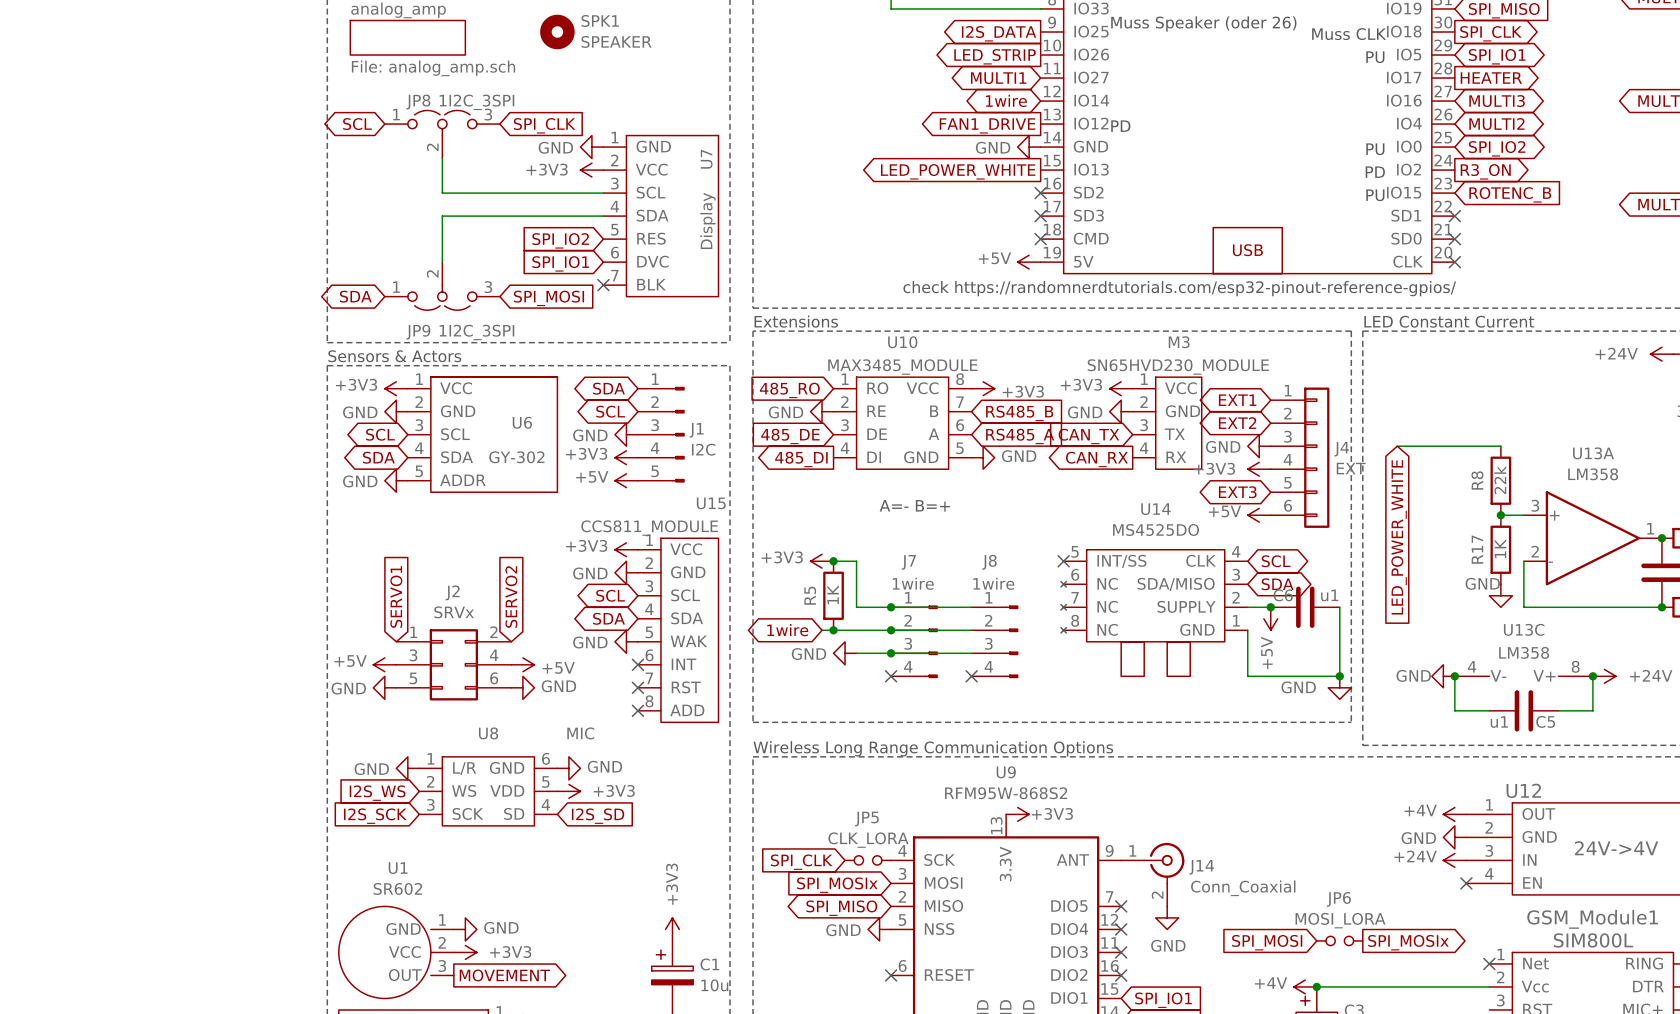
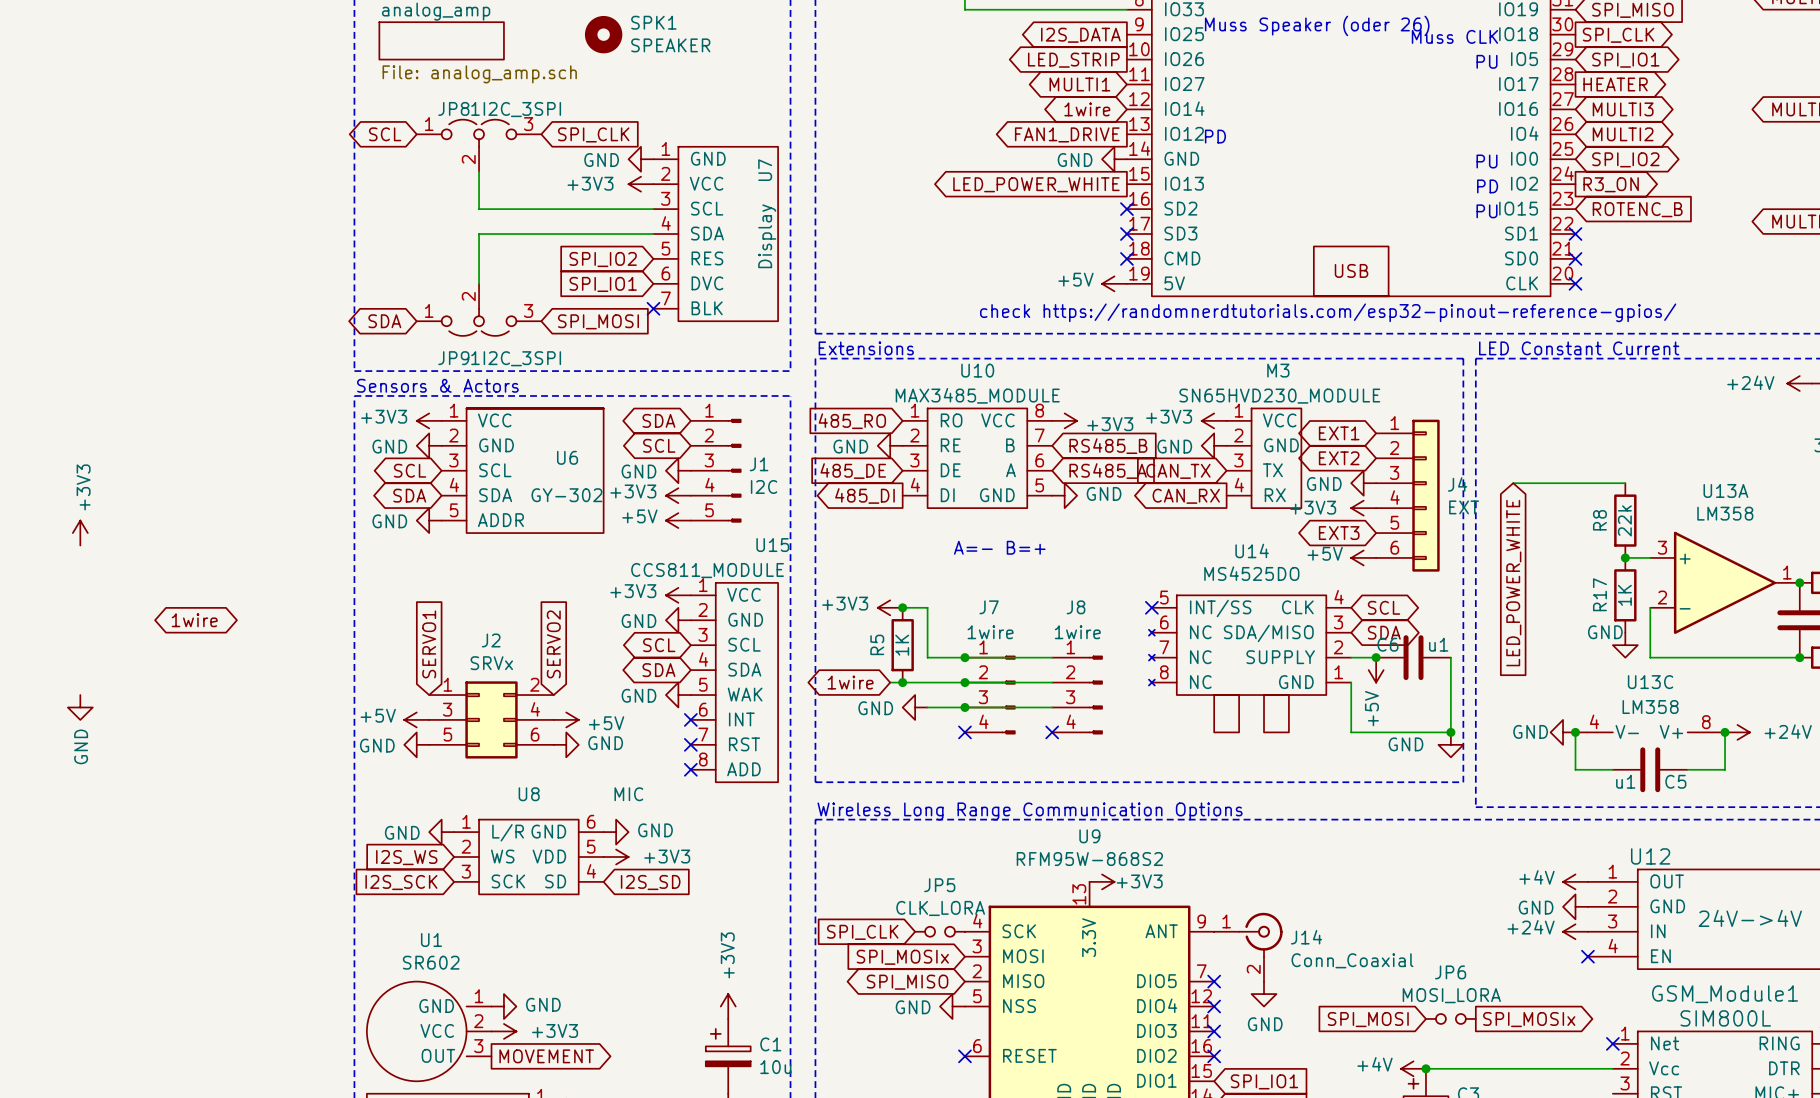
power symbol: none -> +3V3 (80, 533)
global label: none -> 1wire (194, 620)
power symbol: none -> GND (80, 707)

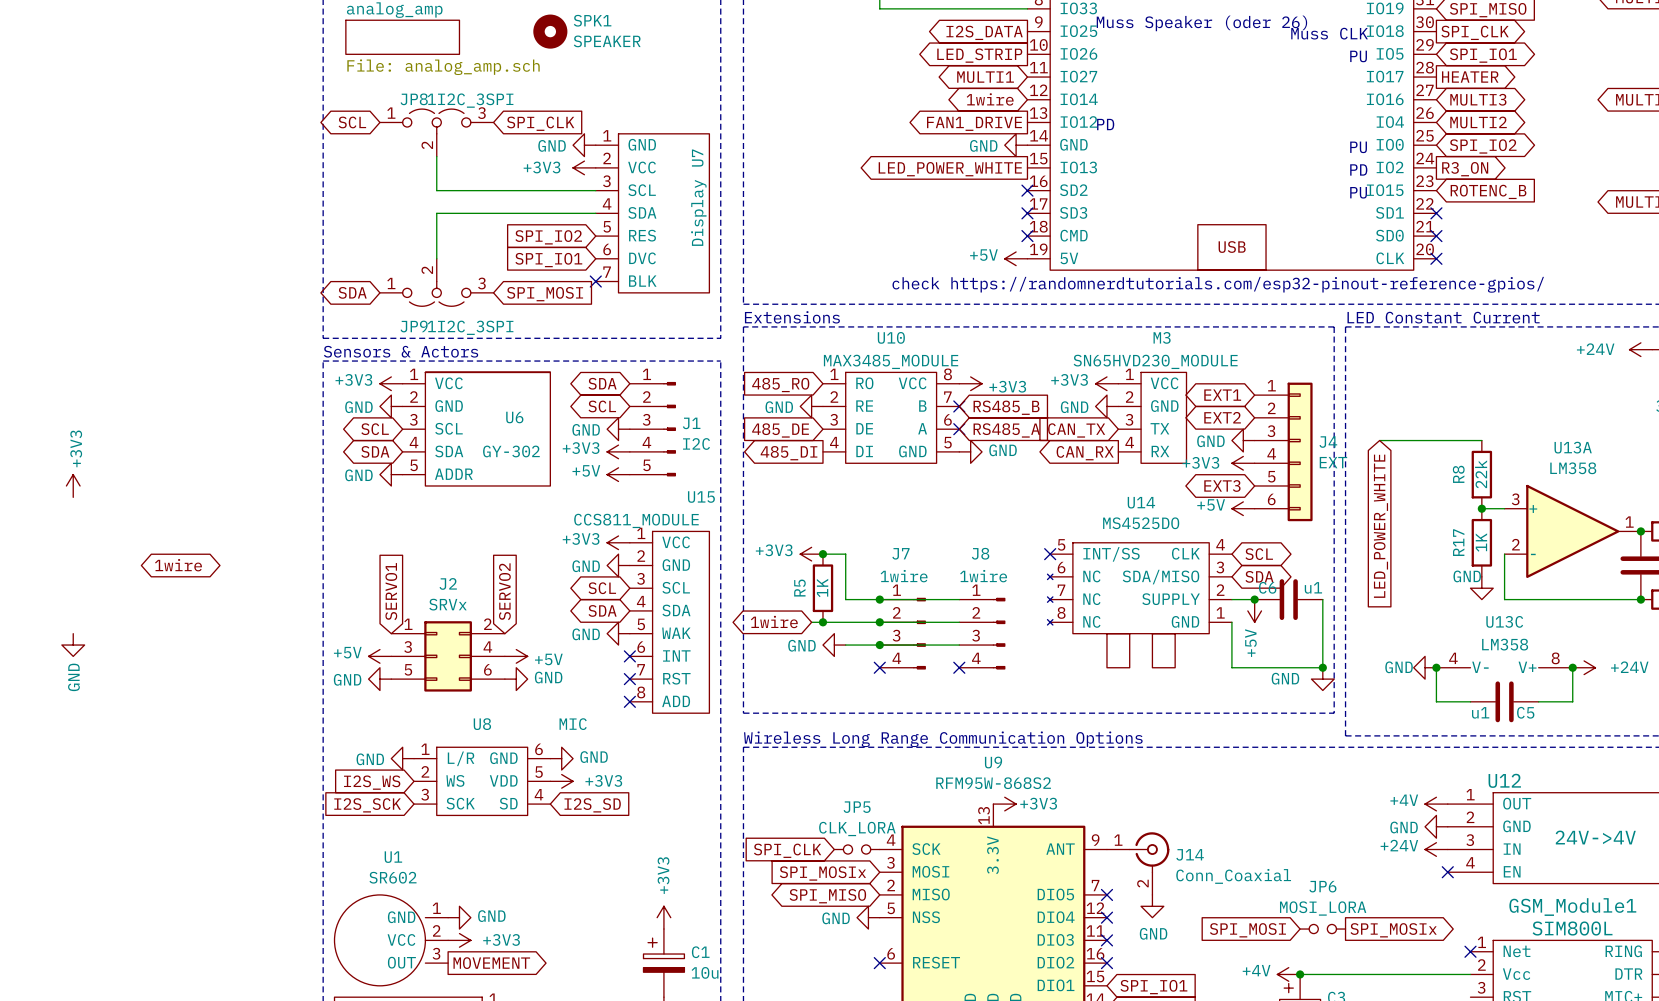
no-connect mark: none -> (959, 406)
no-connect mark: none -> (959, 429)
text: A=- B=+ (999, 547) -> none

